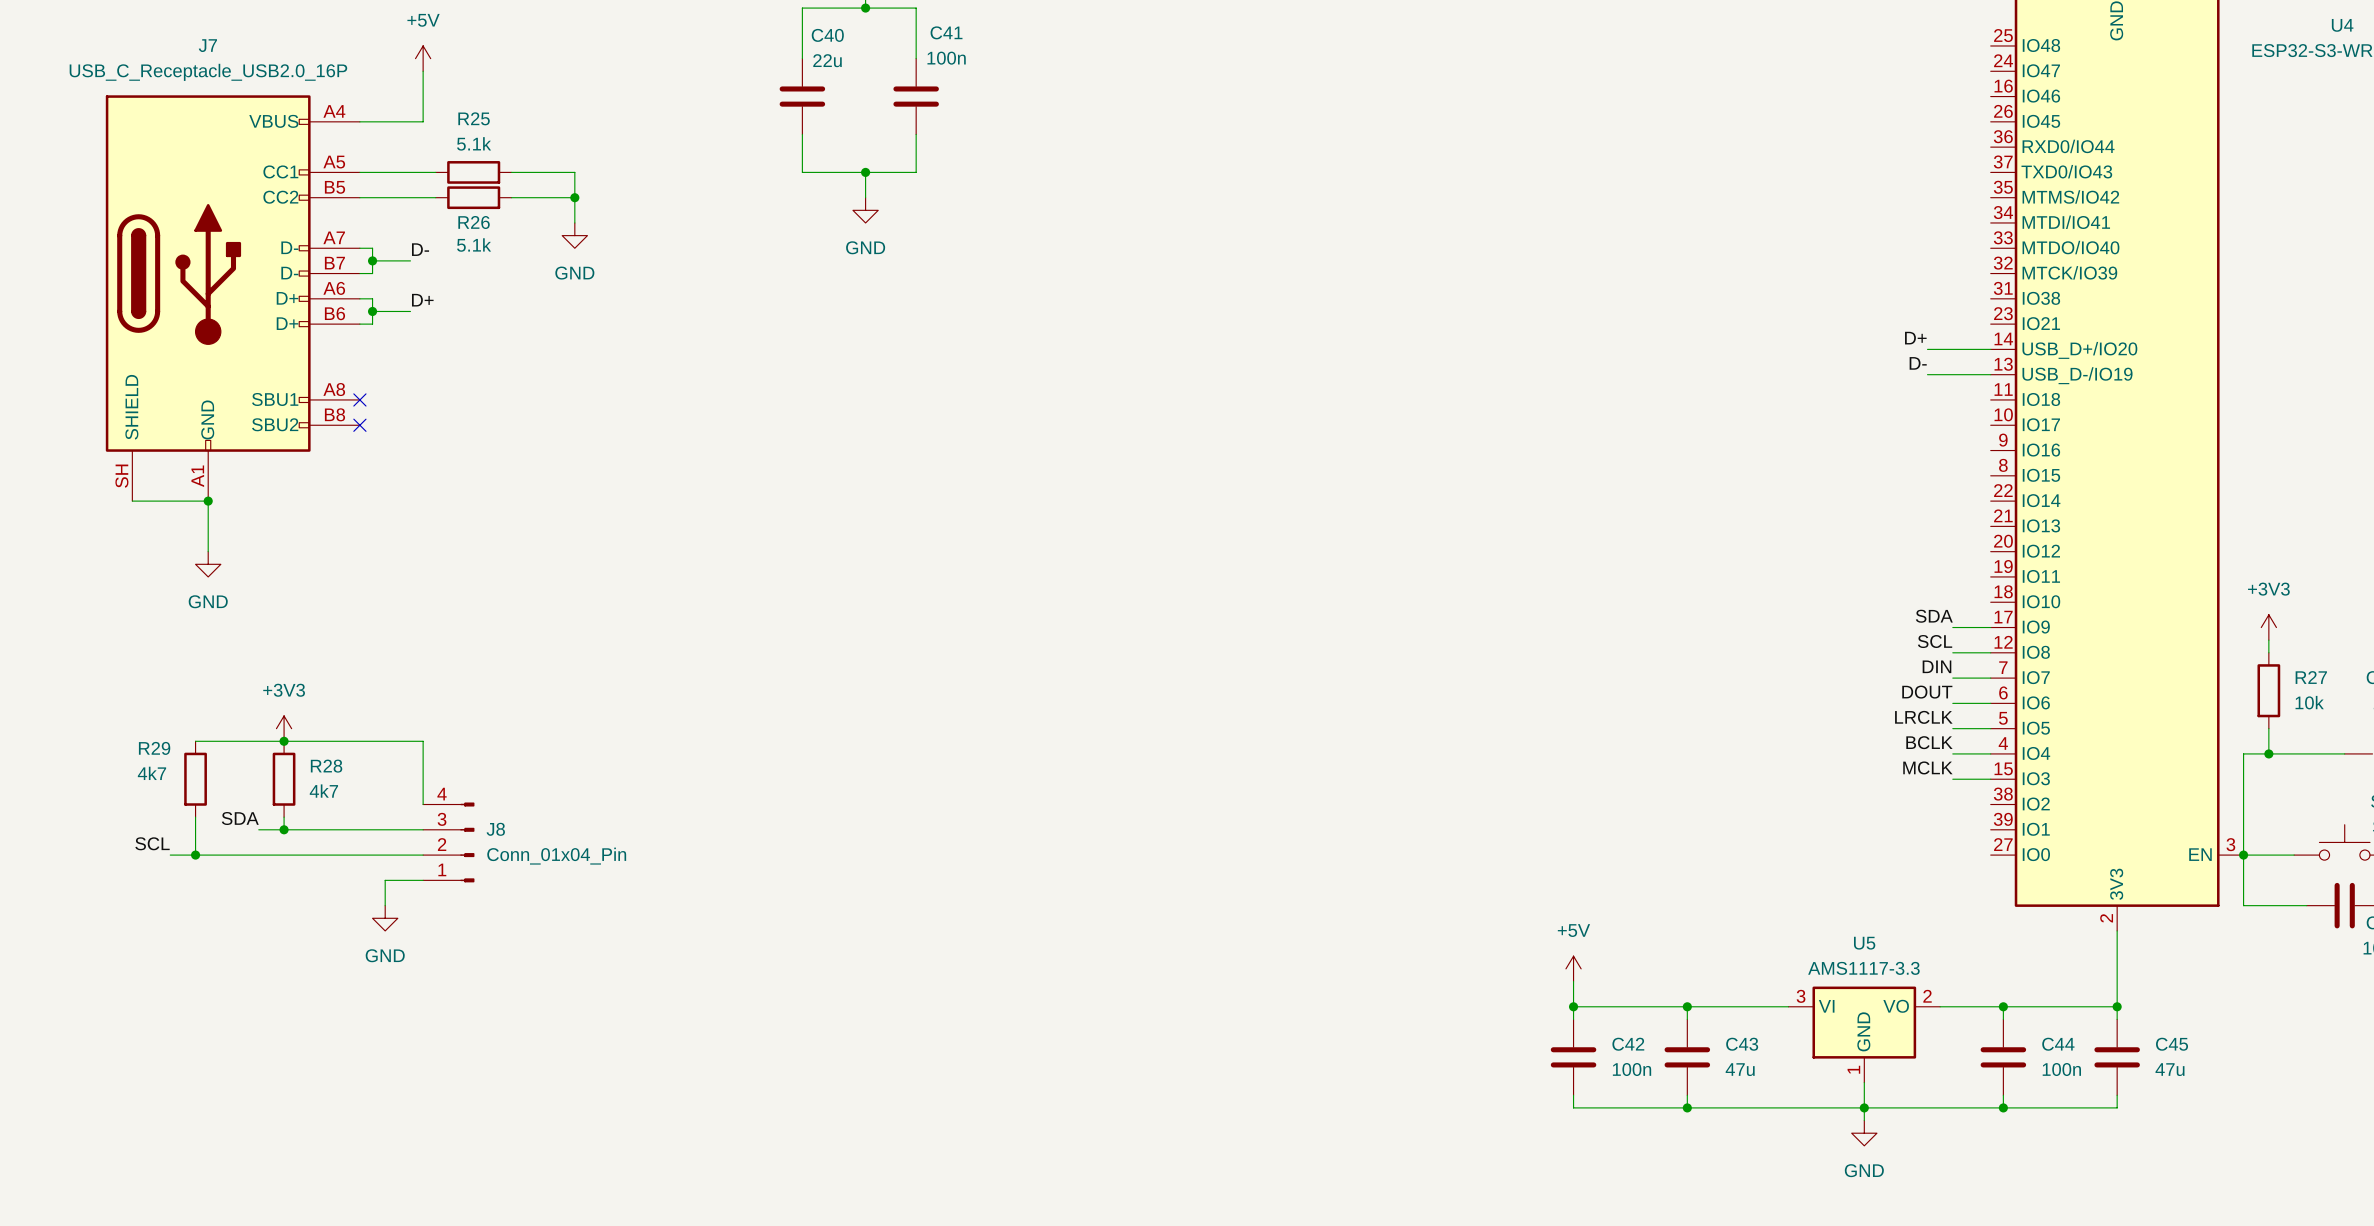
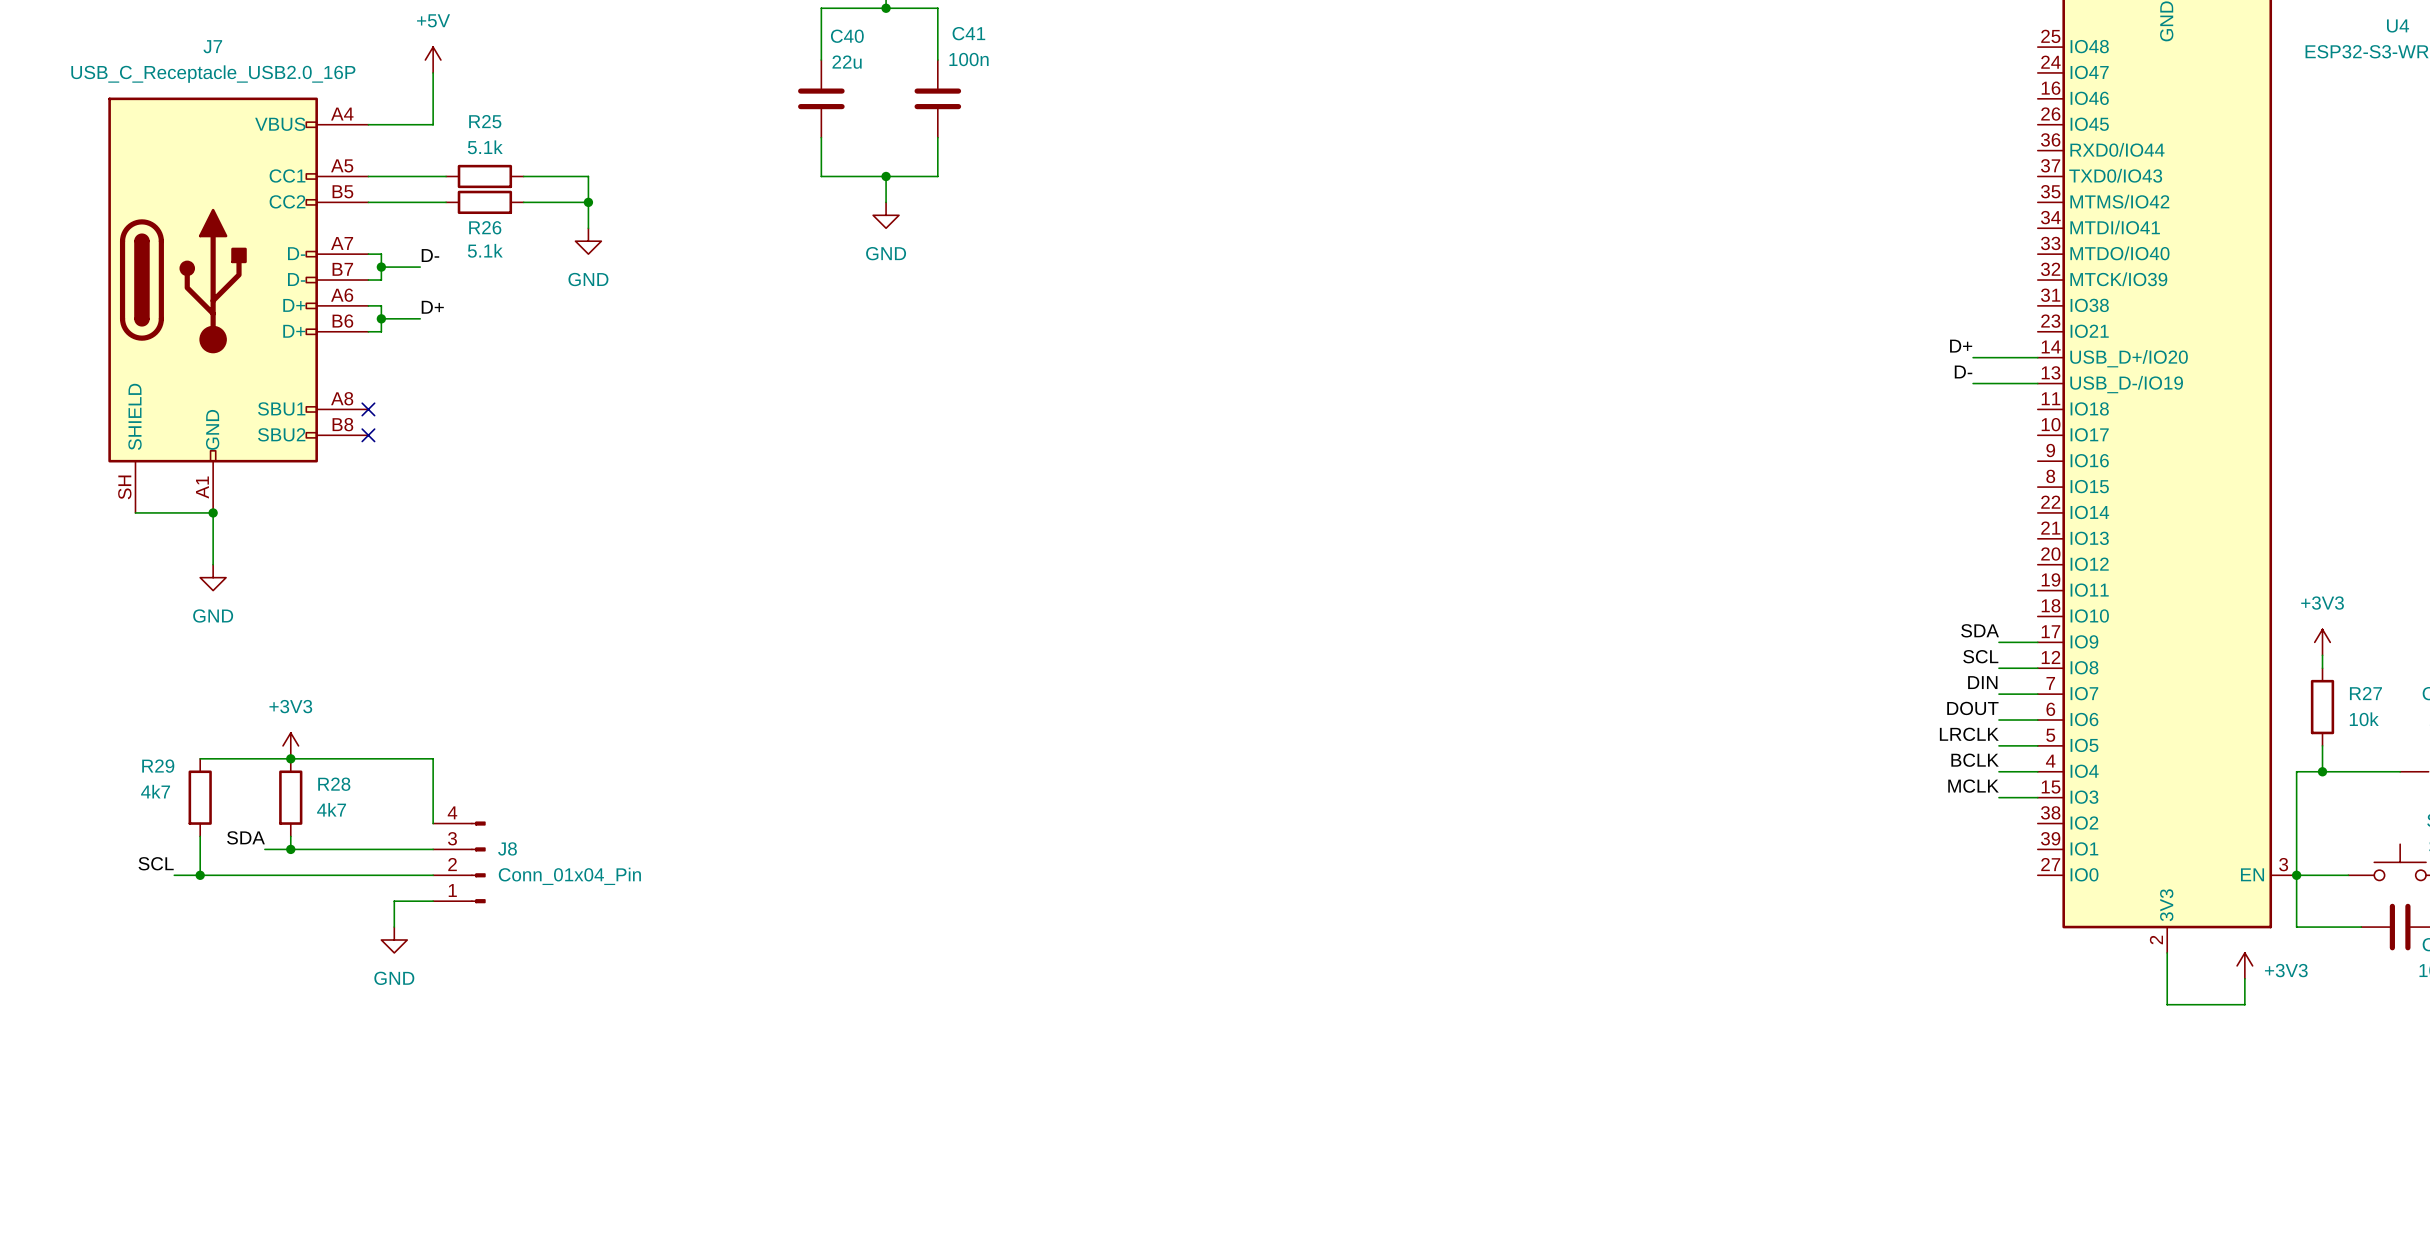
power symbol: none -> +3V3 (2244, 965)
power symbol: +5V (1573, 968) -> none
wire: (1573, 981) (1573, 1019) -> none
wire: (2117, 981) (2117, 1019) -> (2167, 1004) (2244, 1004) (2244, 978)
wire: (1573, 1006) (1788, 1006) -> none
junction: (1573, 1006) -> none
wire: (1687, 1006) (1687, 1019) -> none
junction: (1687, 1006) -> none
wire: (1940, 1006) (2117, 1006) -> none
wire: (2003, 1006) (2003, 1019) -> none
junction: (2003, 1006) -> none
junction: (2117, 1006) -> none
U5: AMS1117-3.3 (1864, 1034) -> none
C42: 100n (1573, 1057) -> none
C43: 47u (1687, 1057) -> none
C44: 100n (2003, 1057) -> none
C45: 47u (2117, 1057) -> none
wire: (1864, 1082) (1864, 1120) -> none
wire: (1573, 1095) (1573, 1107) (2117, 1107) (2117, 1095) -> none
wire: (1687, 1095) (1687, 1107) -> none
wire: (2003, 1095) (2003, 1107) -> none
junction: (1687, 1107) -> none
junction: (1864, 1107) -> none
junction: (2003, 1107) -> none
power symbol: GND (1864, 1133) -> none

